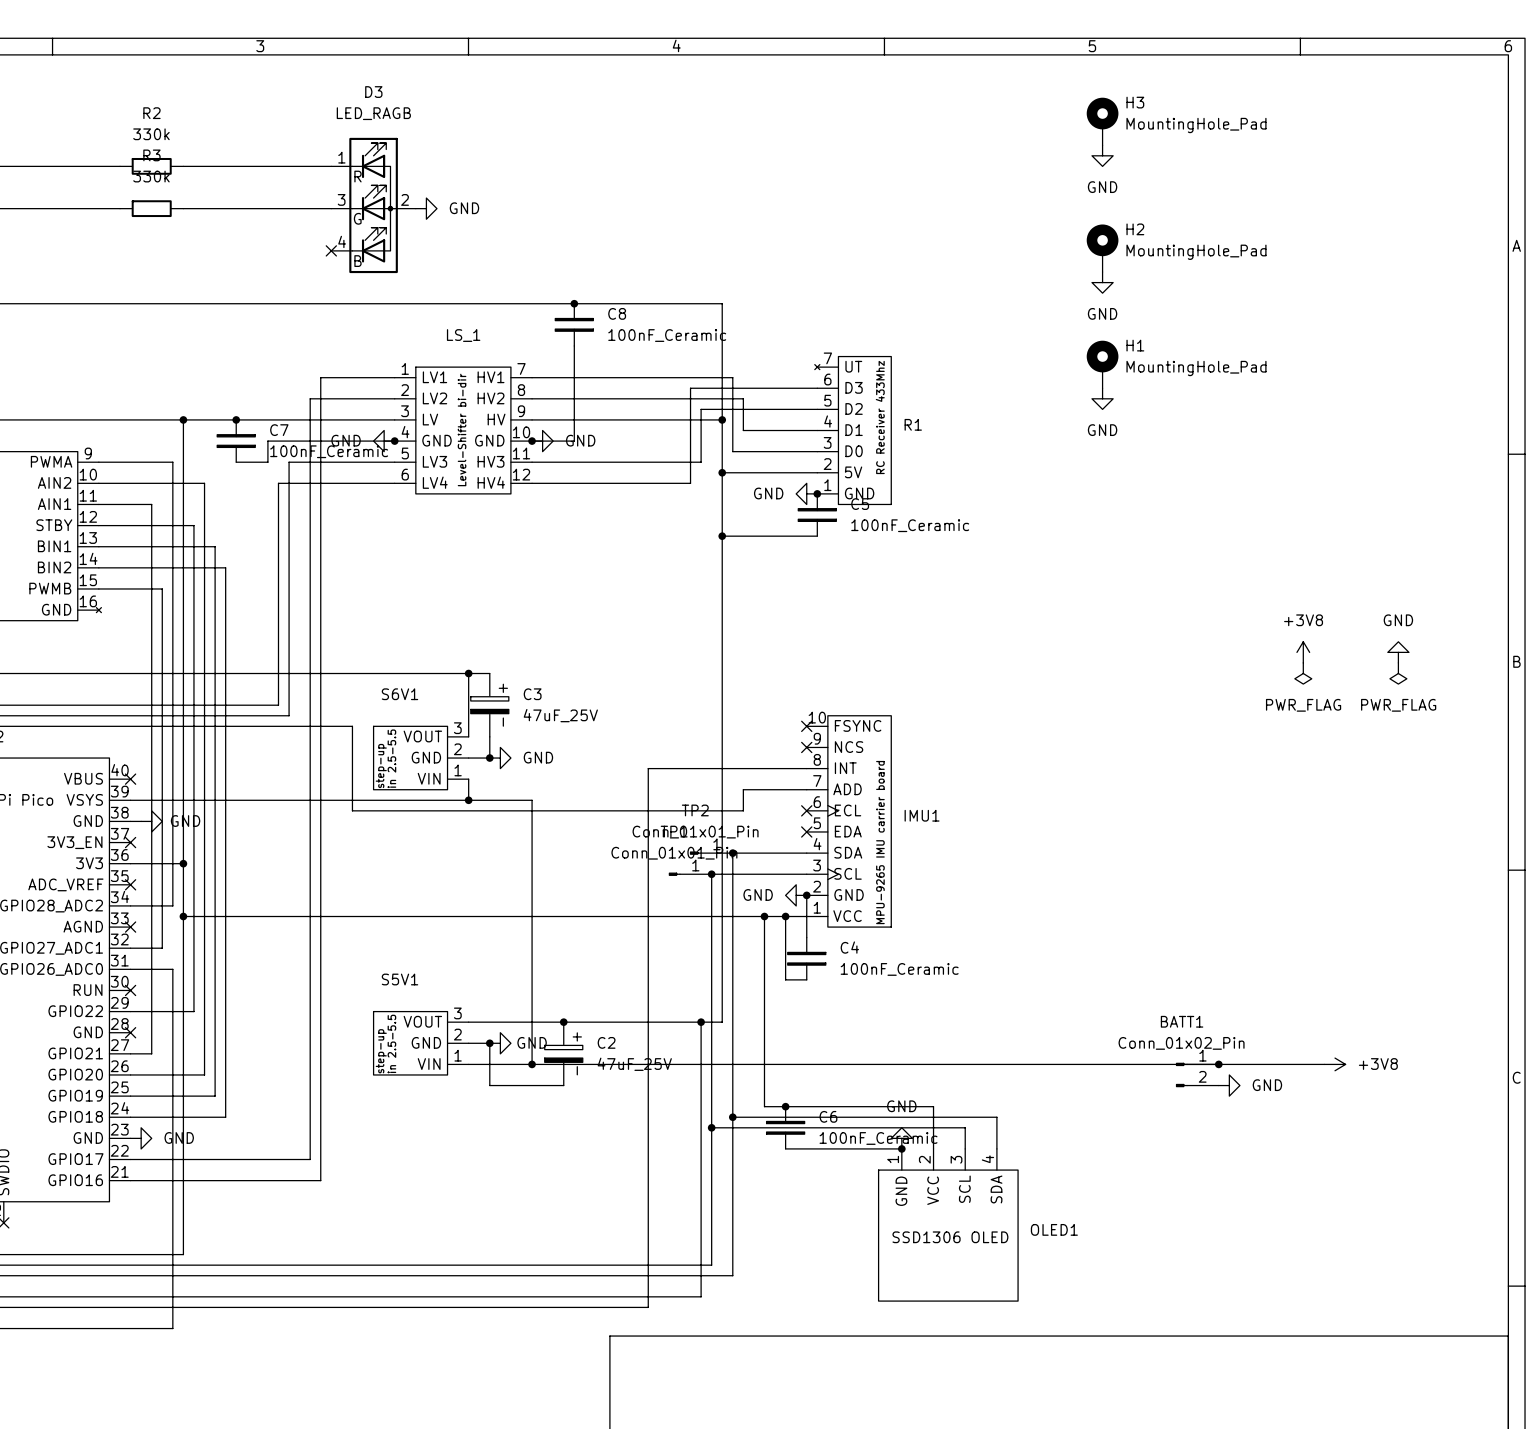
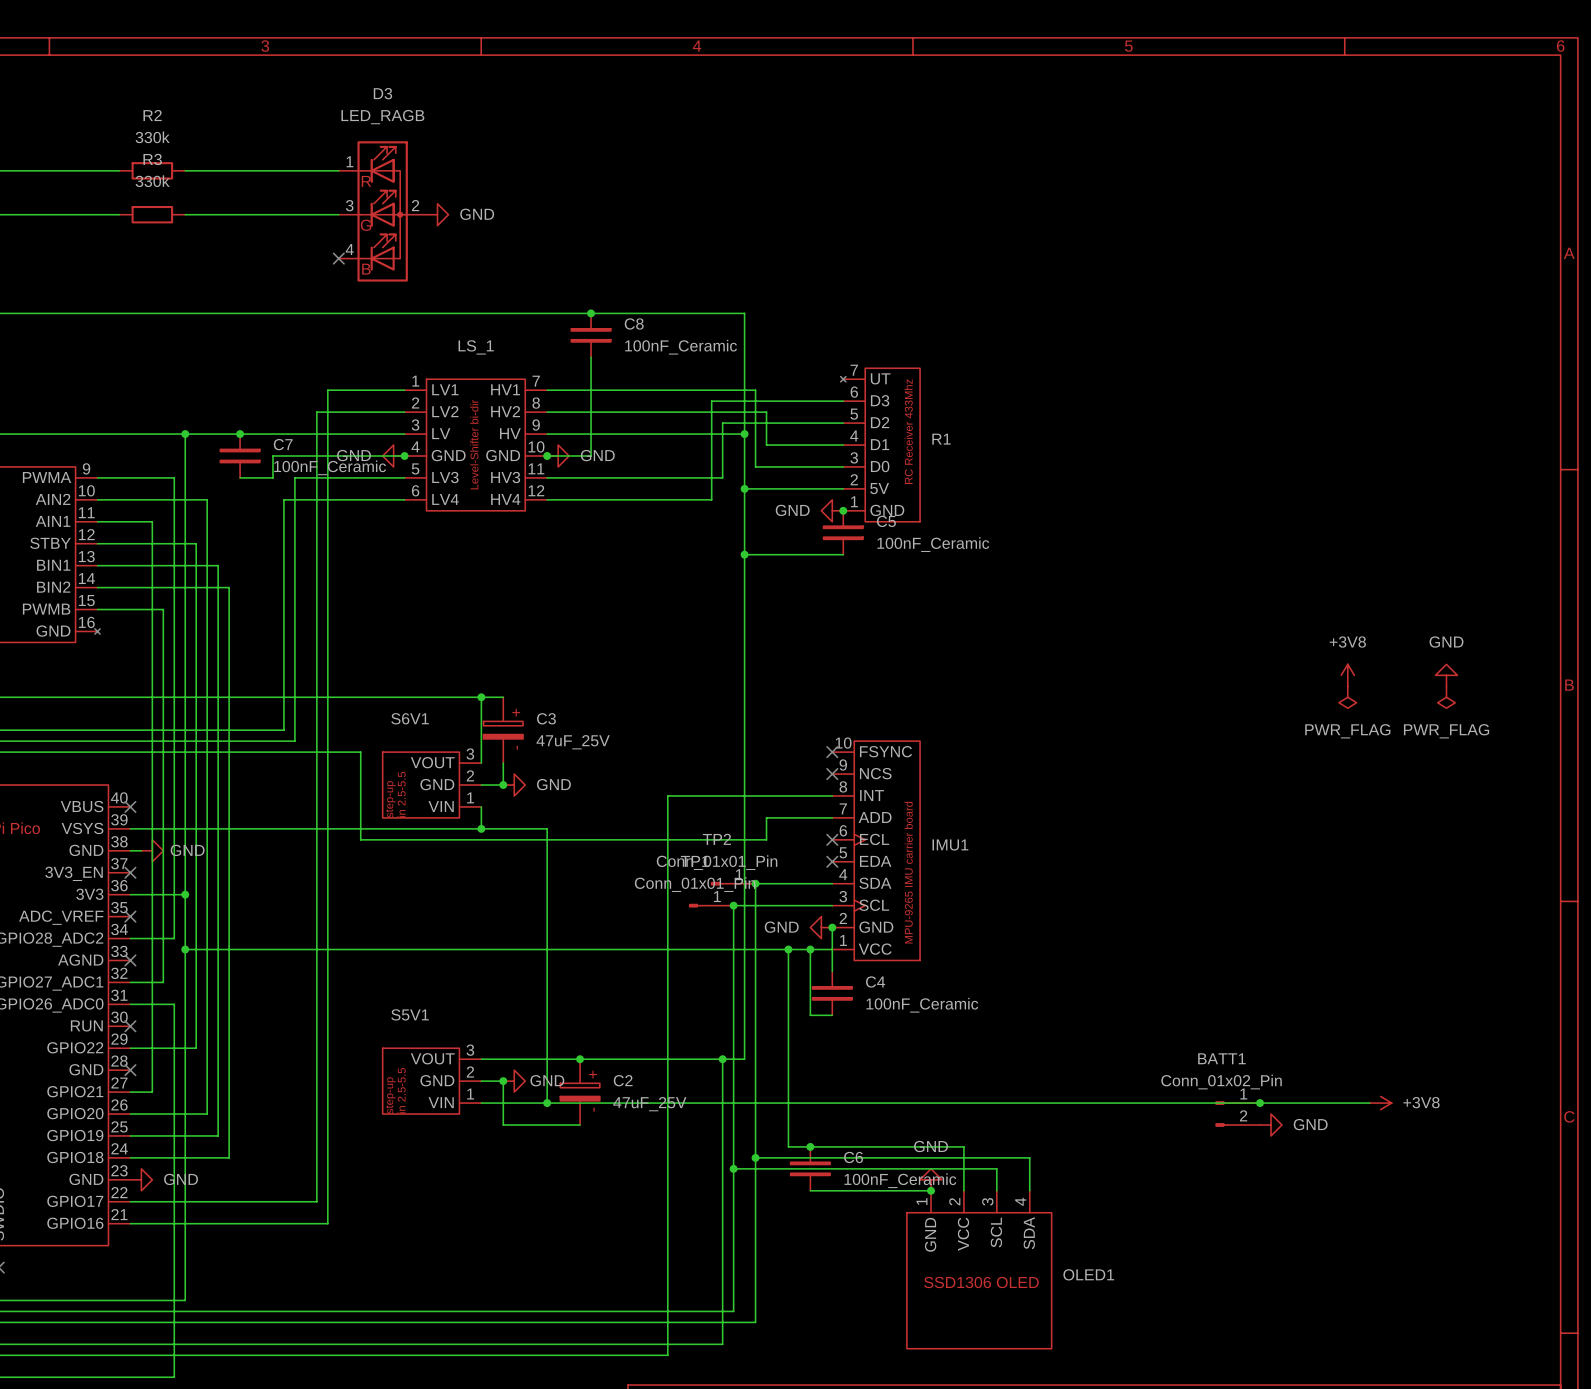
H3: MountingHole_Pad (1102, 121) -> none
power symbol: GND (1102, 155) -> none
H2: MountingHole_Pad (1102, 248) -> none
power symbol: GND (1102, 282) -> none
H1: MountingHole_Pad (1102, 364) -> none
power symbol: GND (1102, 398) -> none

